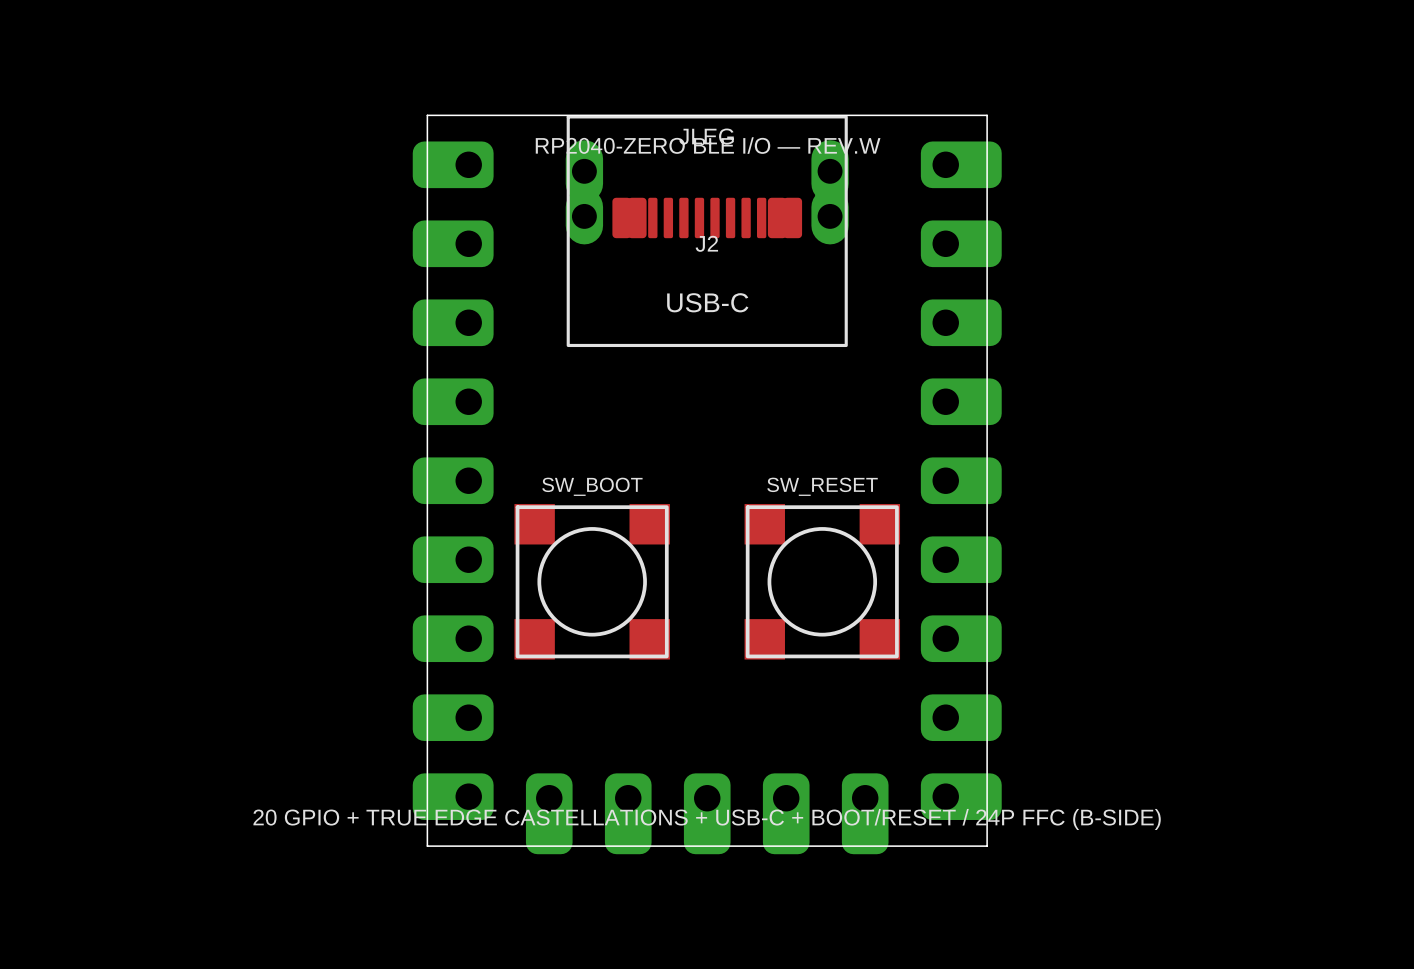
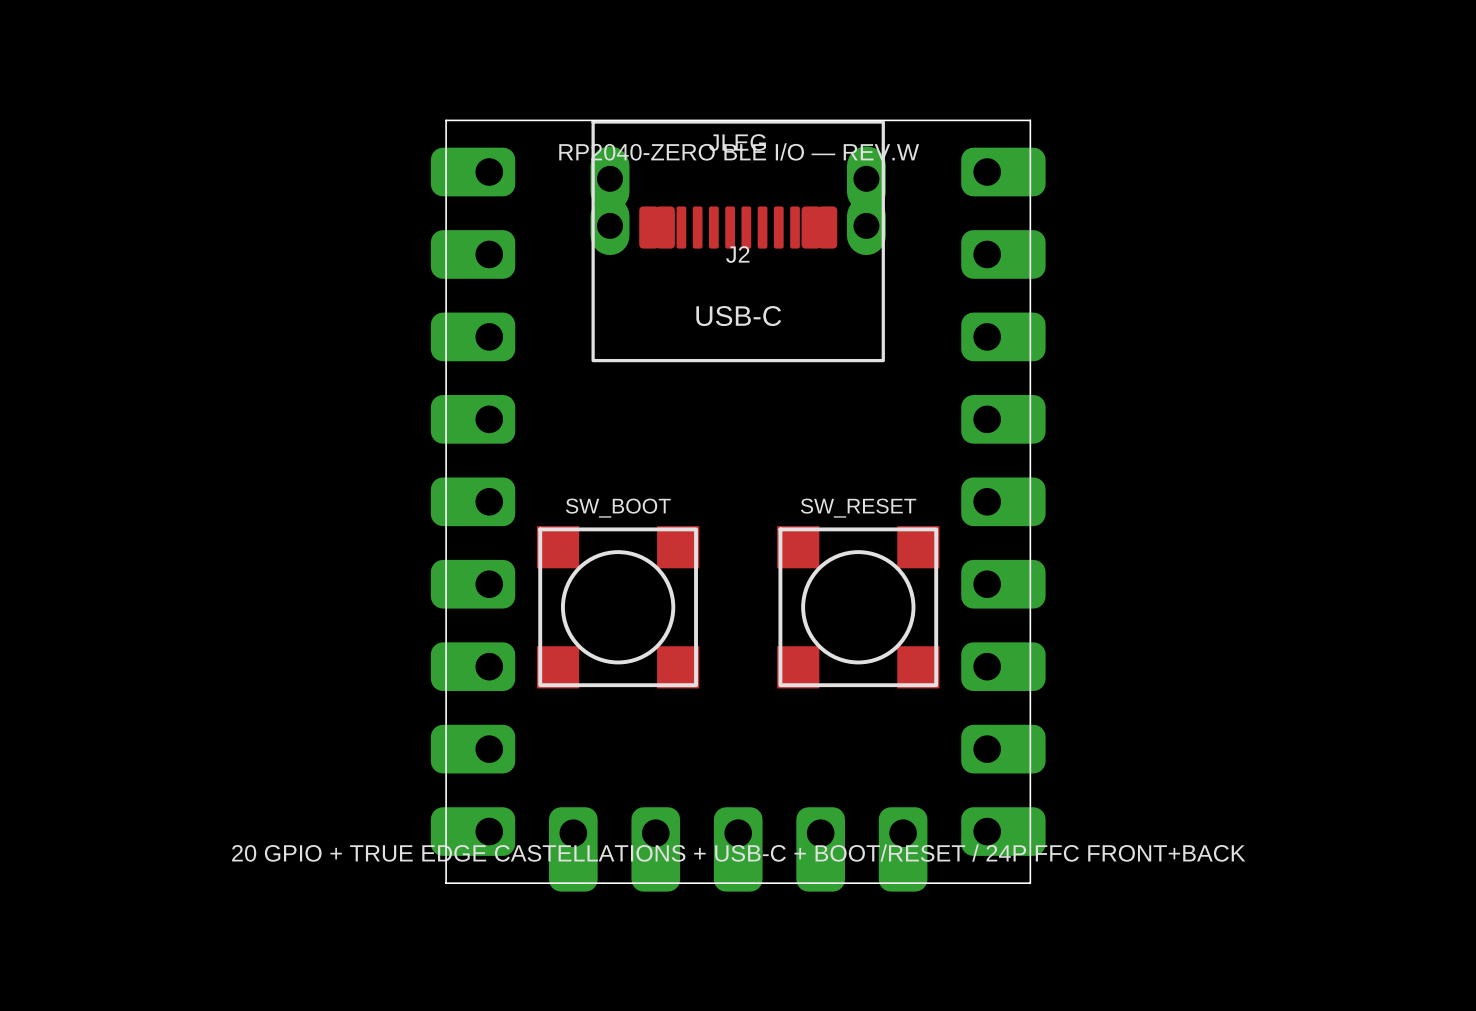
text: 20 GPIO + TRUE EDGE CASTELLATIONS + USB-C + BOOT/RESET / 24P FFC (B-SIDE) (707, 819) -> 20 GPIO + TRUE EDGE CASTELLATIONS + USB-C + BOOT/RESET / 24P FFC FRONT+BACK (738, 853)

